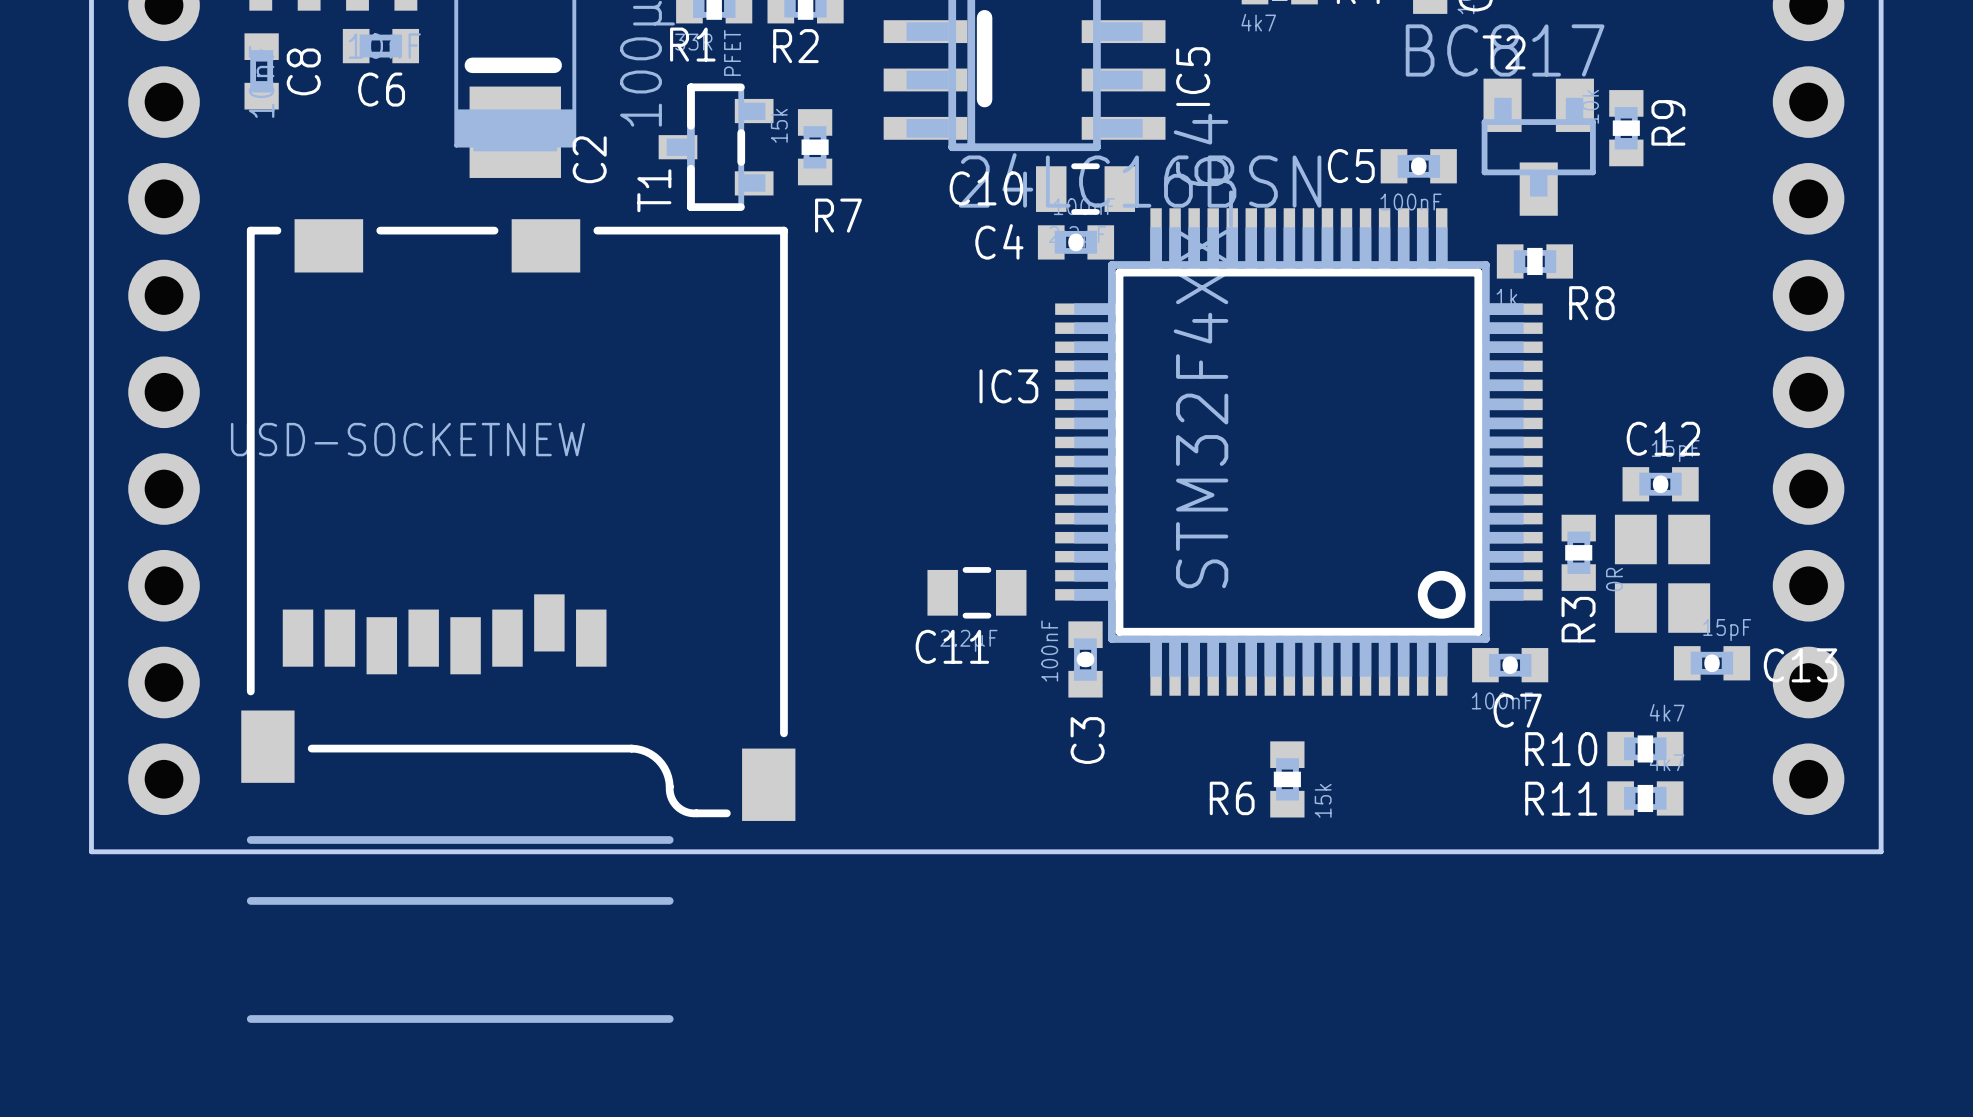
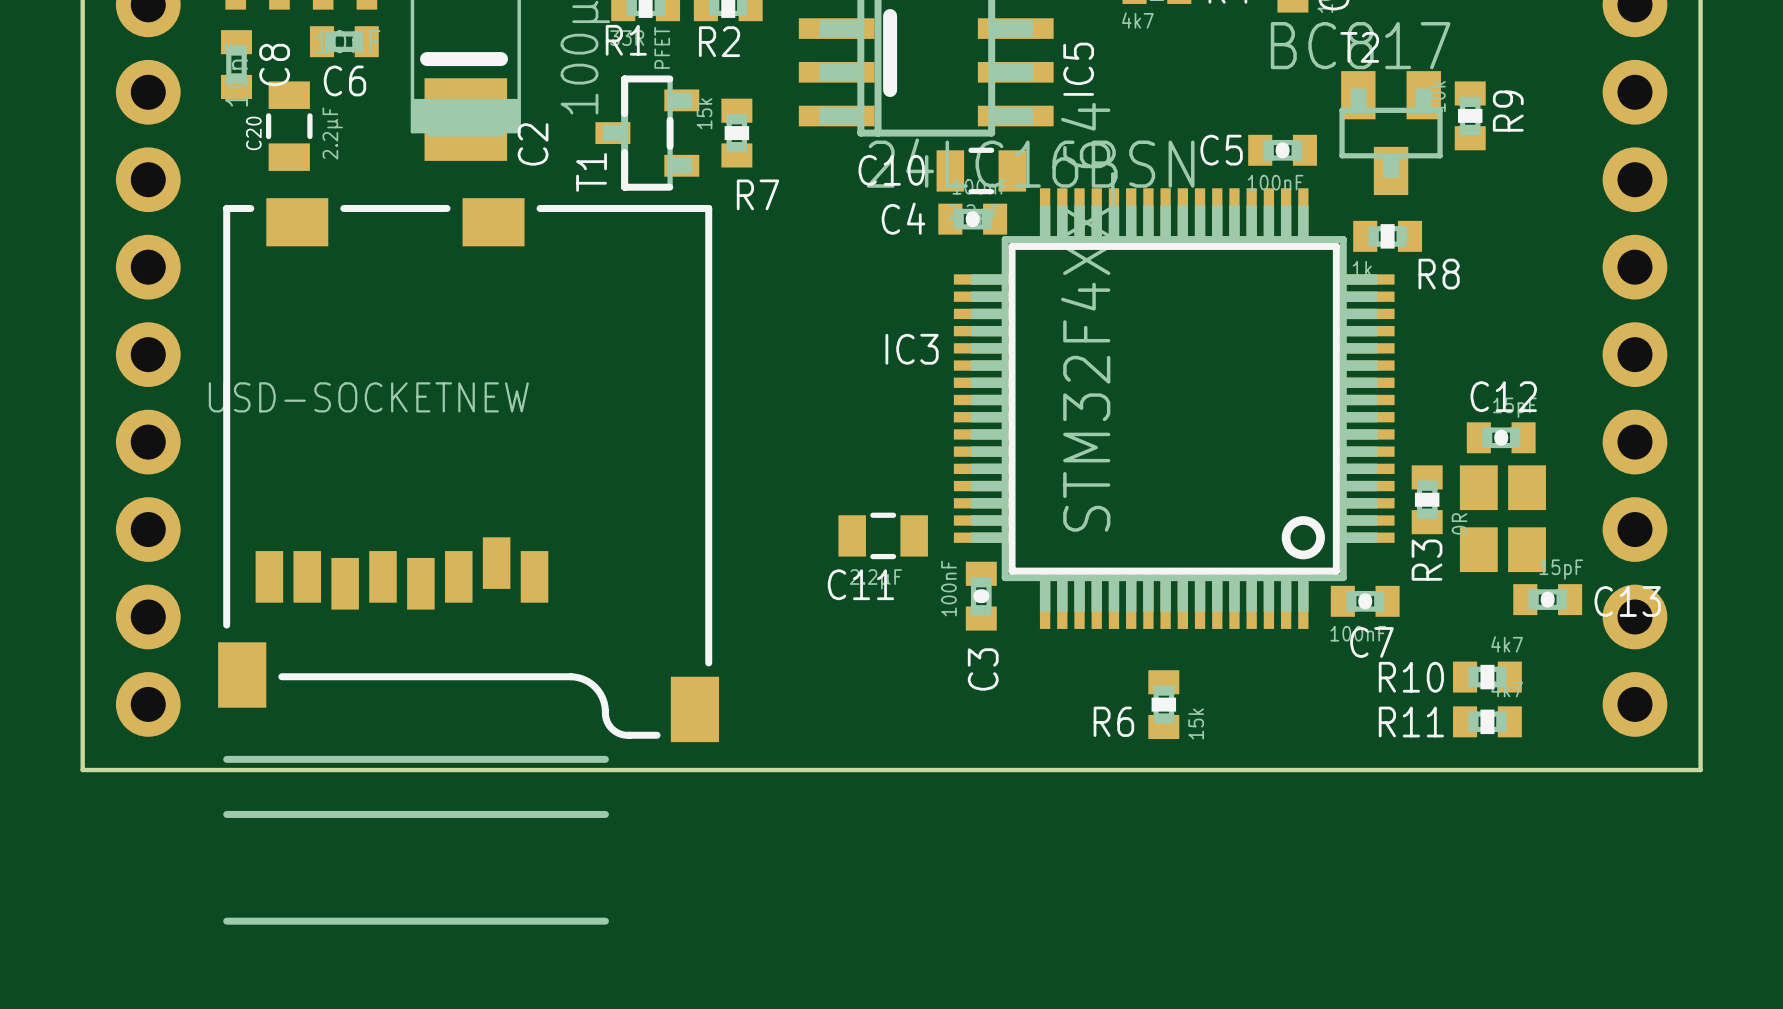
C20: none -> 2.2µF (289, 126)

